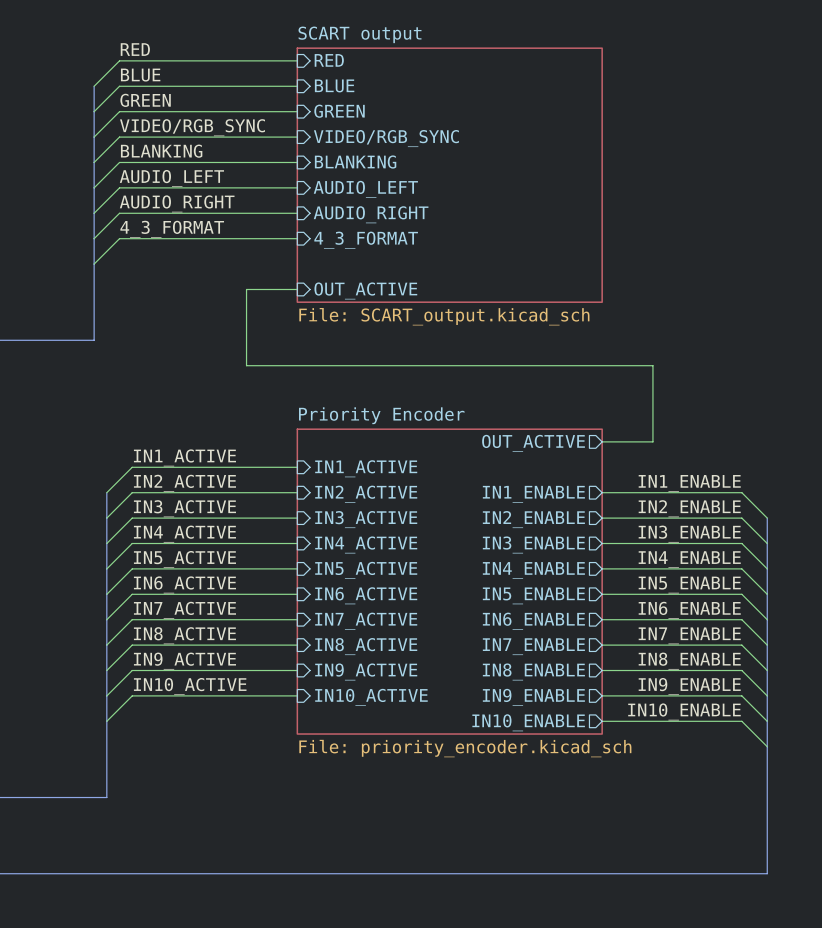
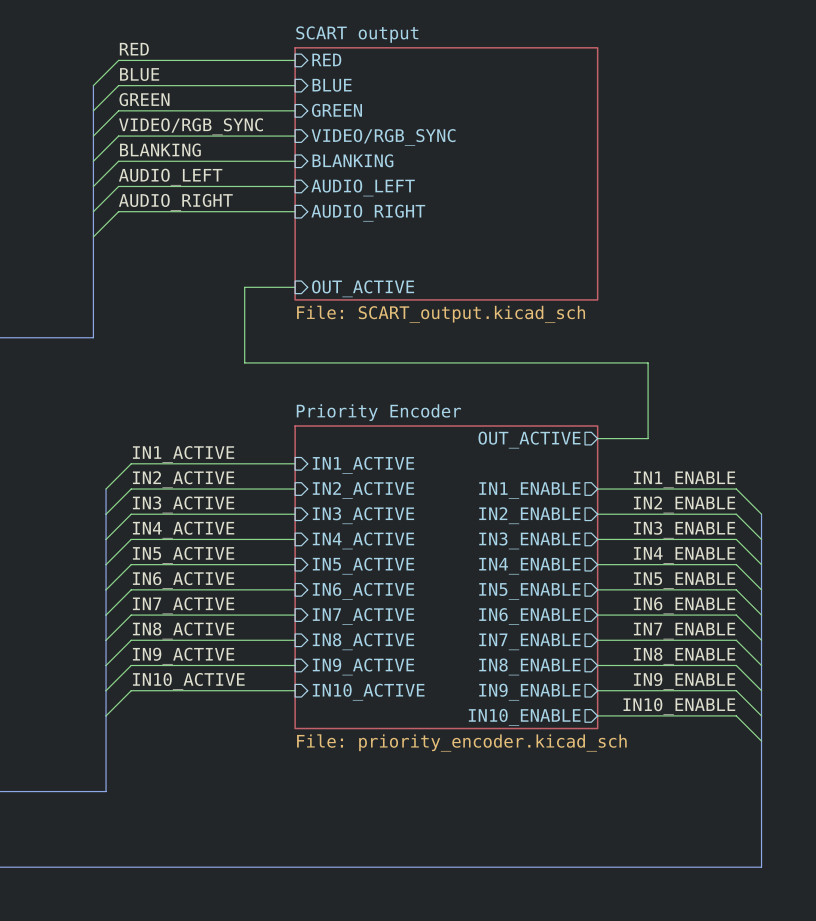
label: 4_3_FORMAT (172, 229) -> none
wire: (297, 238) (119, 238) (94, 264) -> none
sheet pin: 4_3_FORMAT (366, 240) -> none

